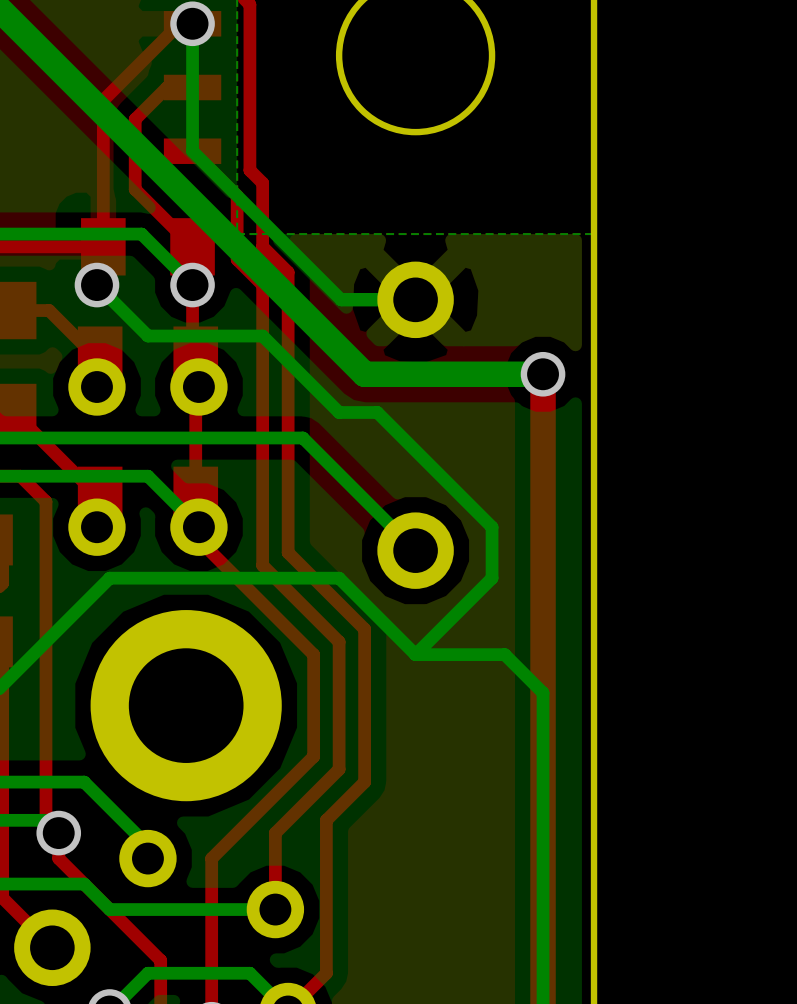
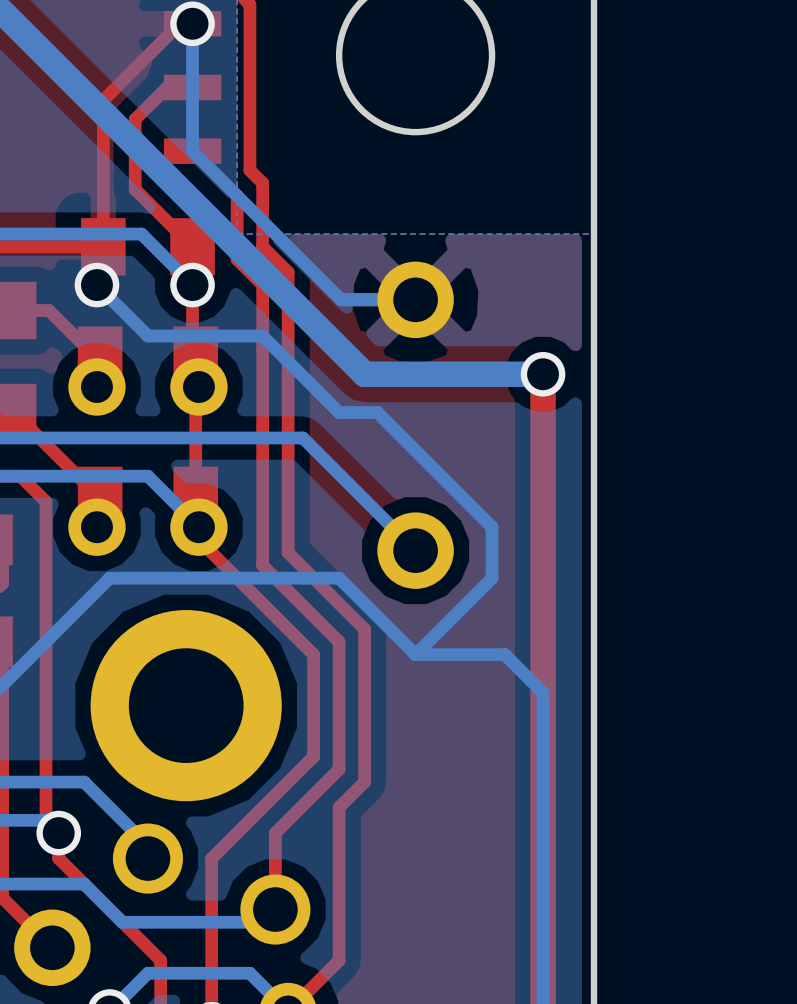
top track: (339, 807) (326, 820) (326, 973) -> (339, 807) (339, 960) (326, 973)
part footprint: [119, 829, 177, 888] -> [112, 823, 184, 894]
part footprint: [246, 880, 305, 939] -> [240, 874, 311, 945]
bottom track: (275, 909) (109, 909) -> (275, 909) (262, 922) (122, 922) (109, 909)

